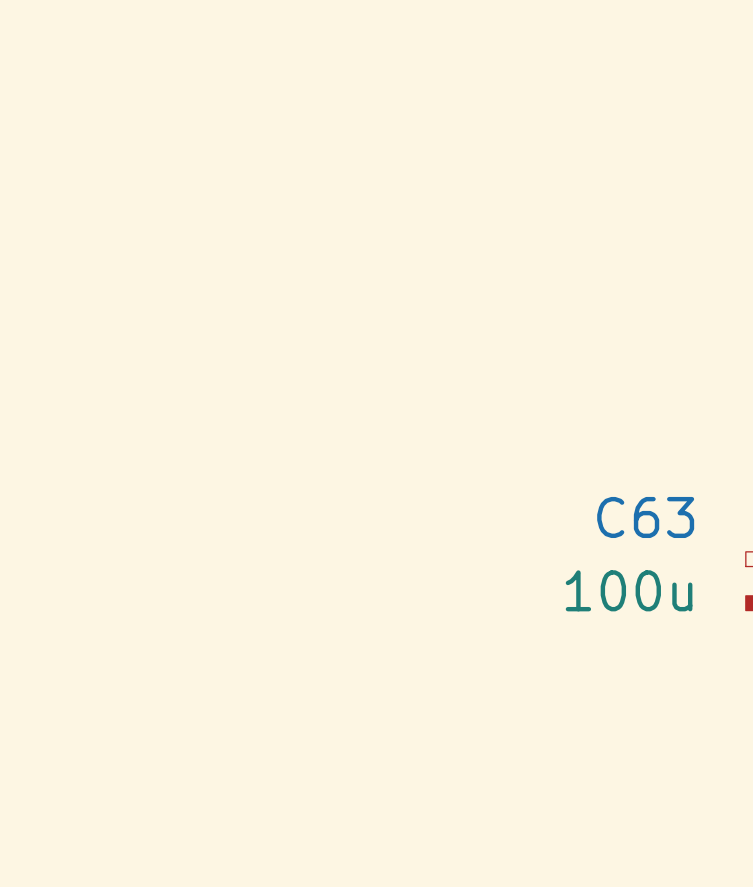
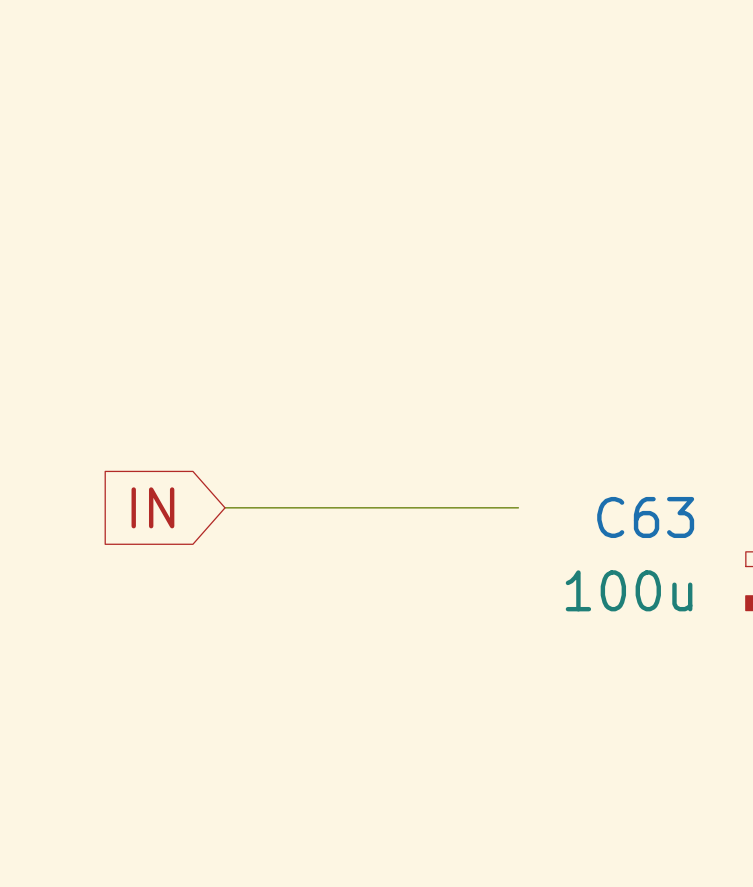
global label: none -> IN (152, 507)
wire: none -> (225, 507) (518, 507)

